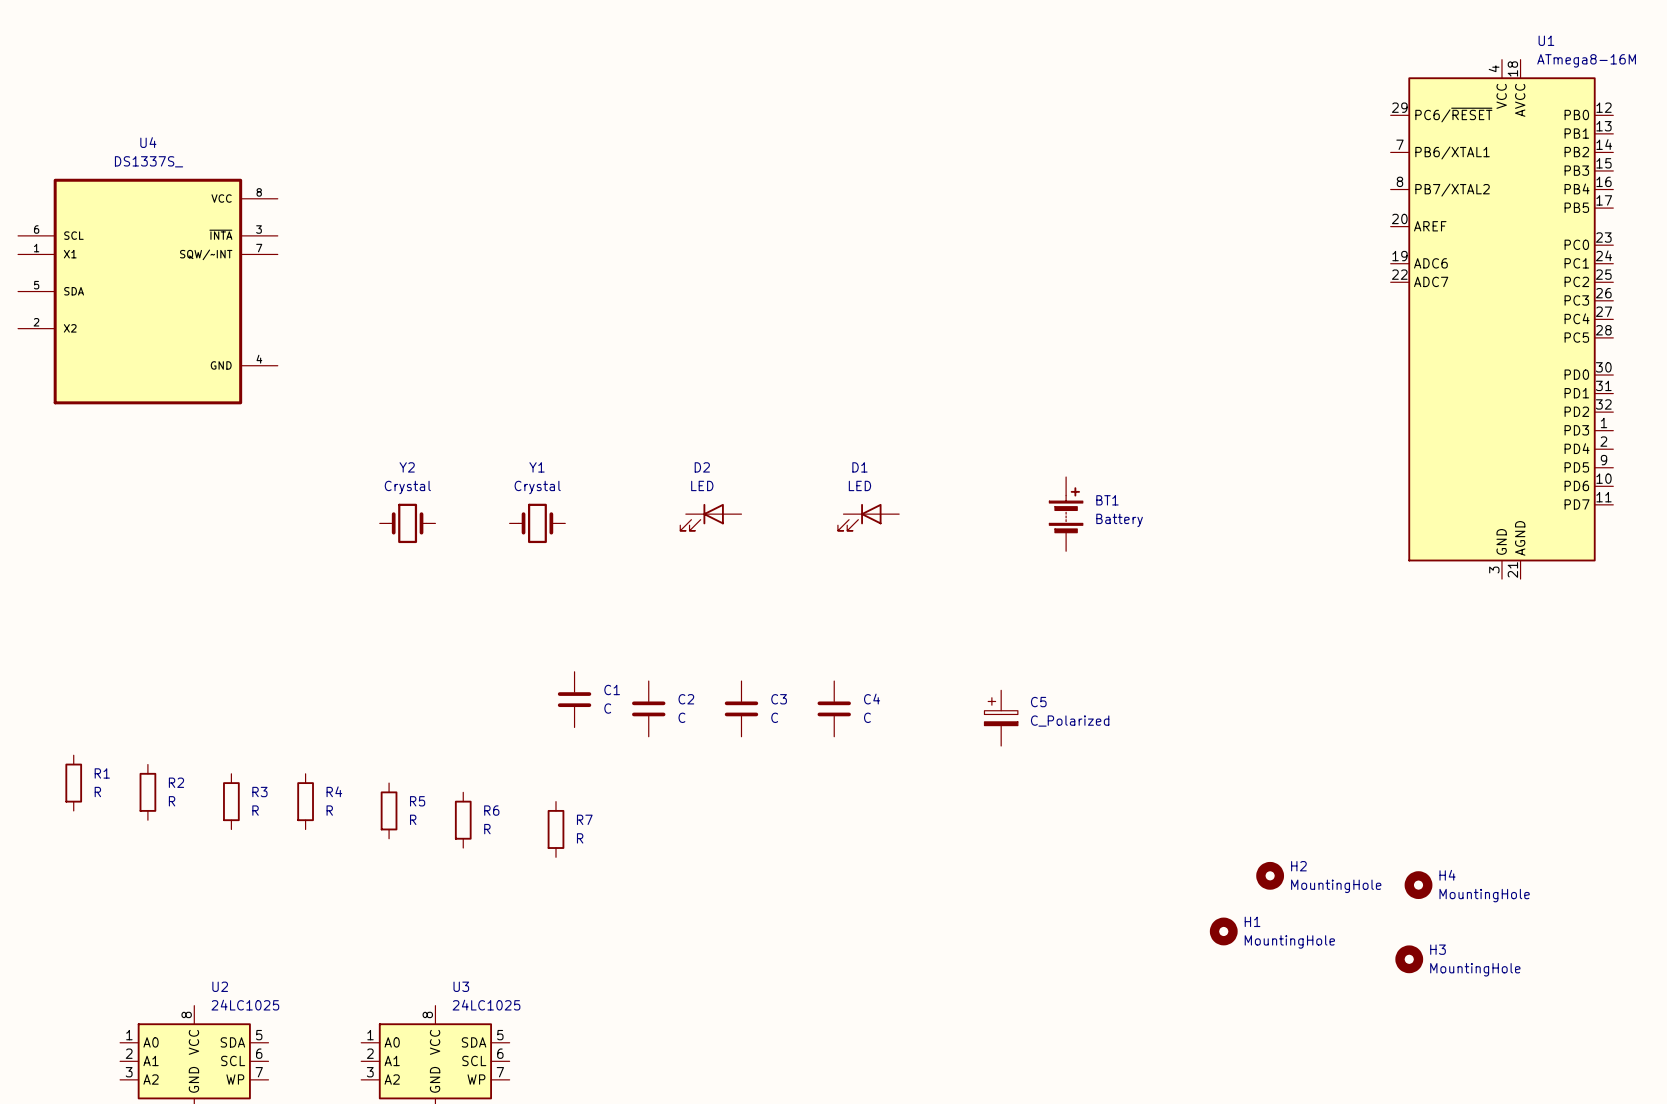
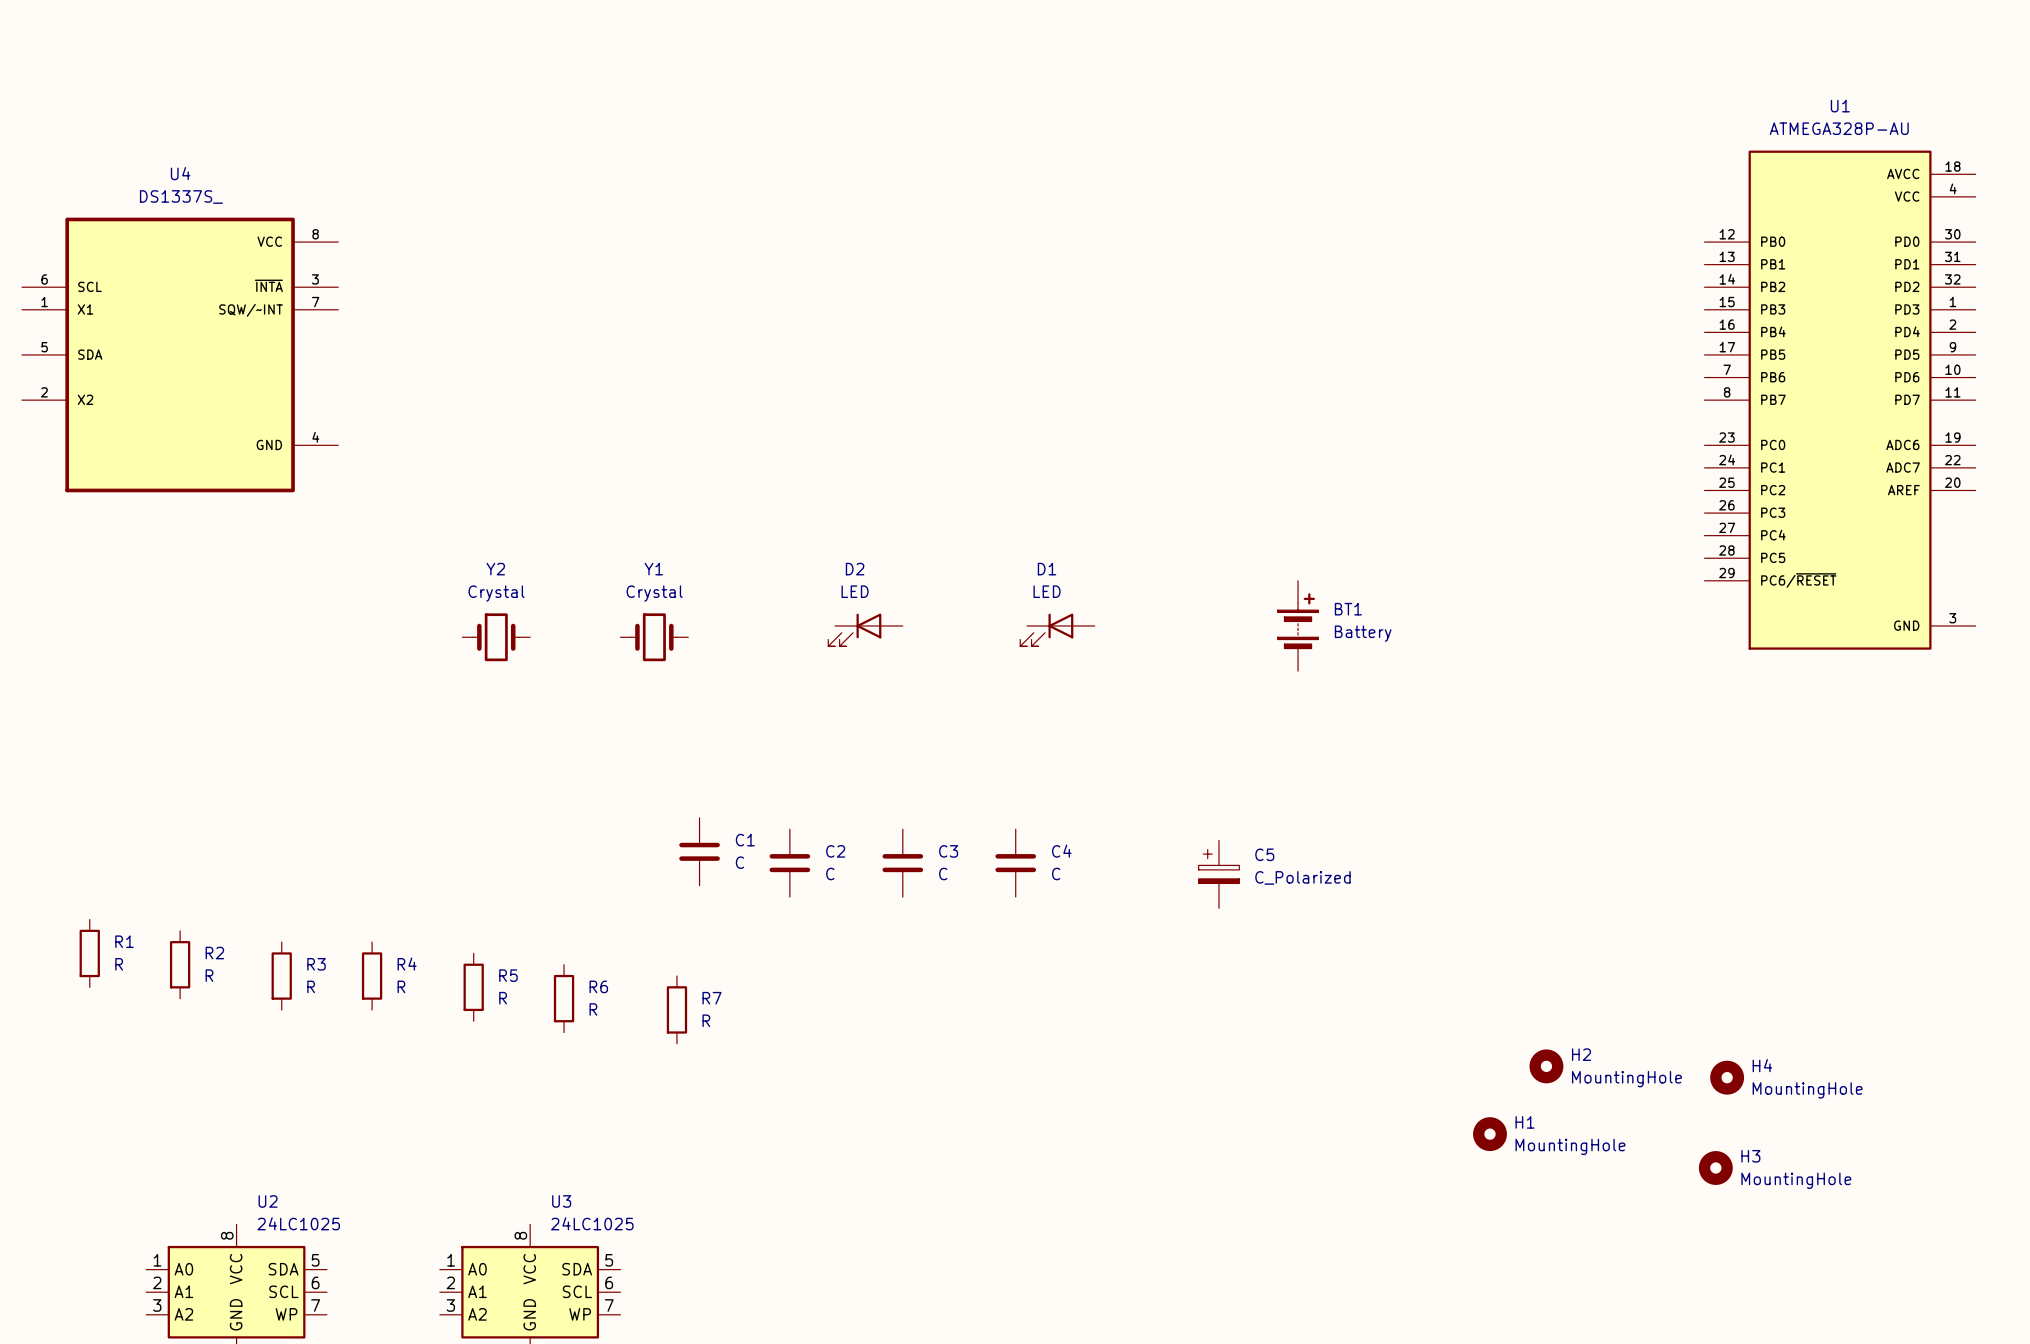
U1 name position: U1 (1546, 40) -> U1 (1840, 106)
U1 symbol: [1390, 59, 1614, 580] -> [1704, 150, 1976, 650]
U1 value: ATmega8-16M (1586, 60) -> ATMEGA328P-AU (1839, 128)

